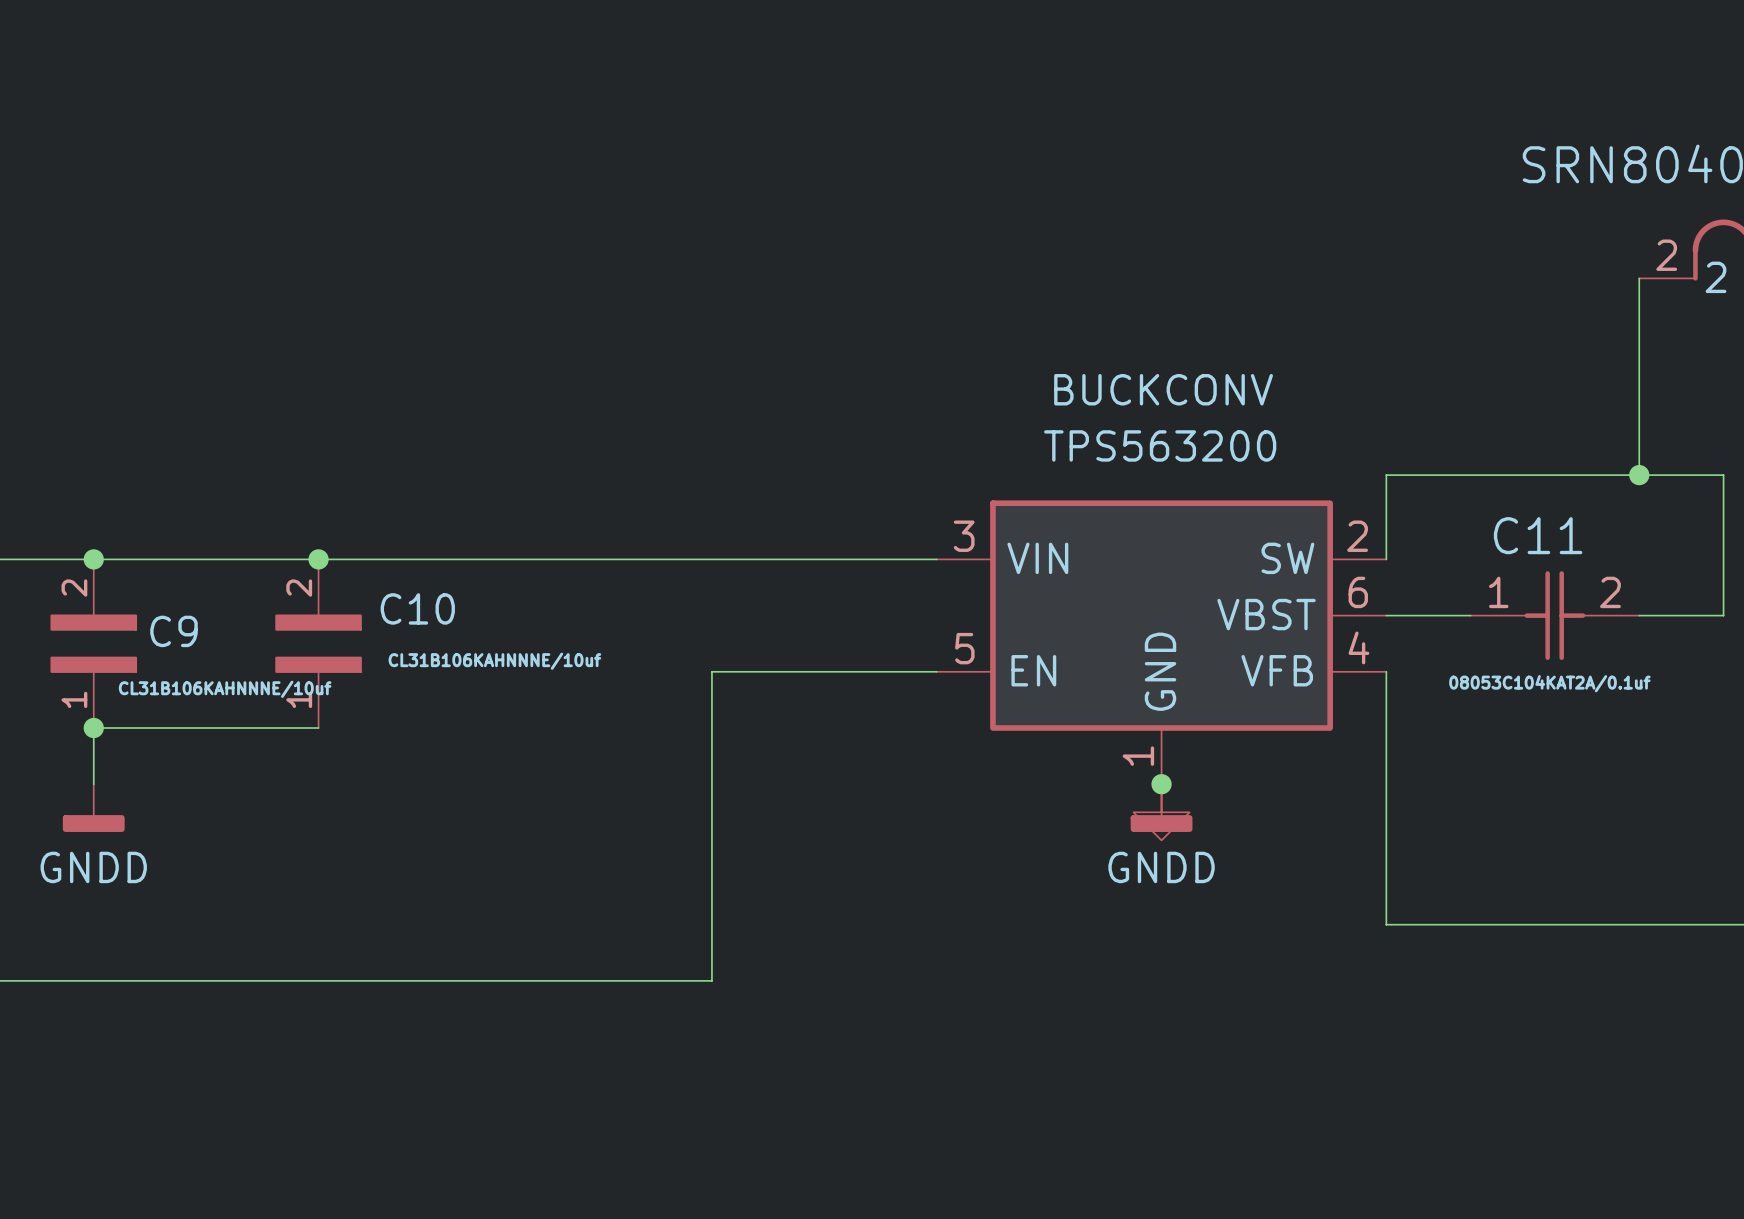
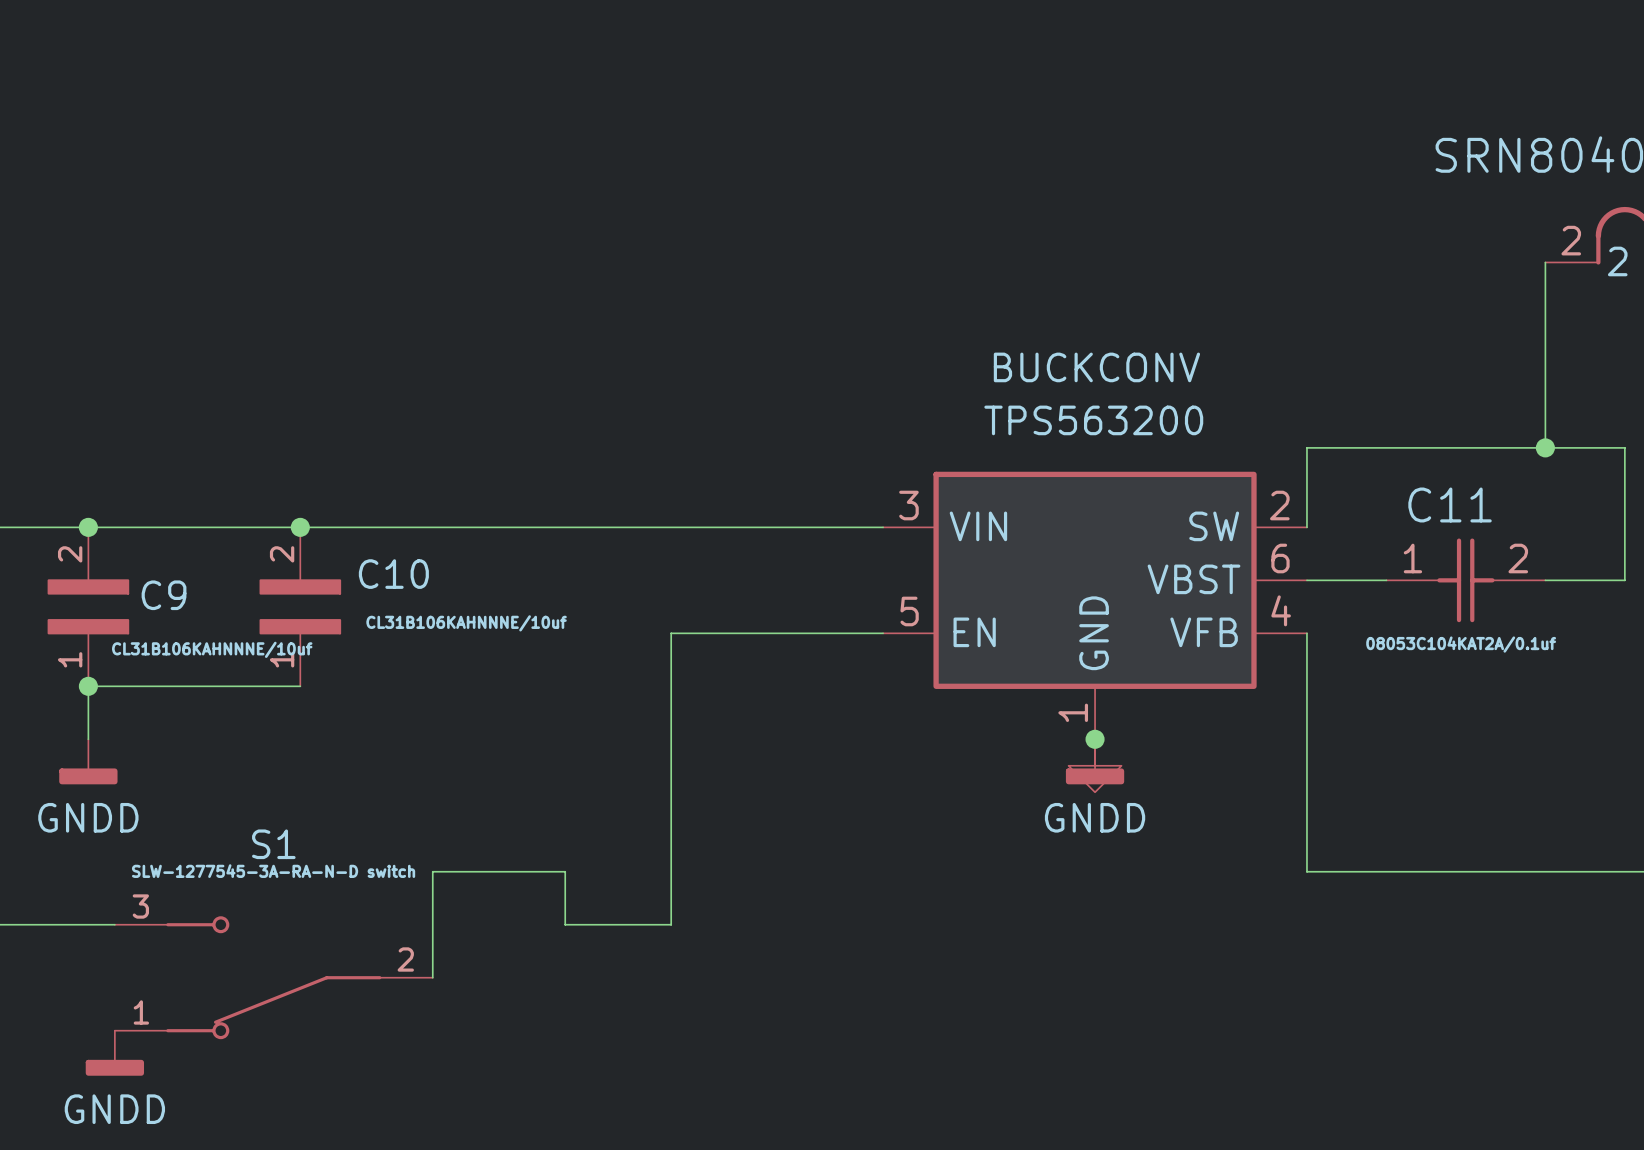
wire: (121, 980) (599, 980) -> (432, 977) (432, 871) (565, 871) (565, 924)
S1: none -> SLW-1277545-3A-RA-N-D switch (273, 977)
power symbol: none -> GNDD (114, 1053)

